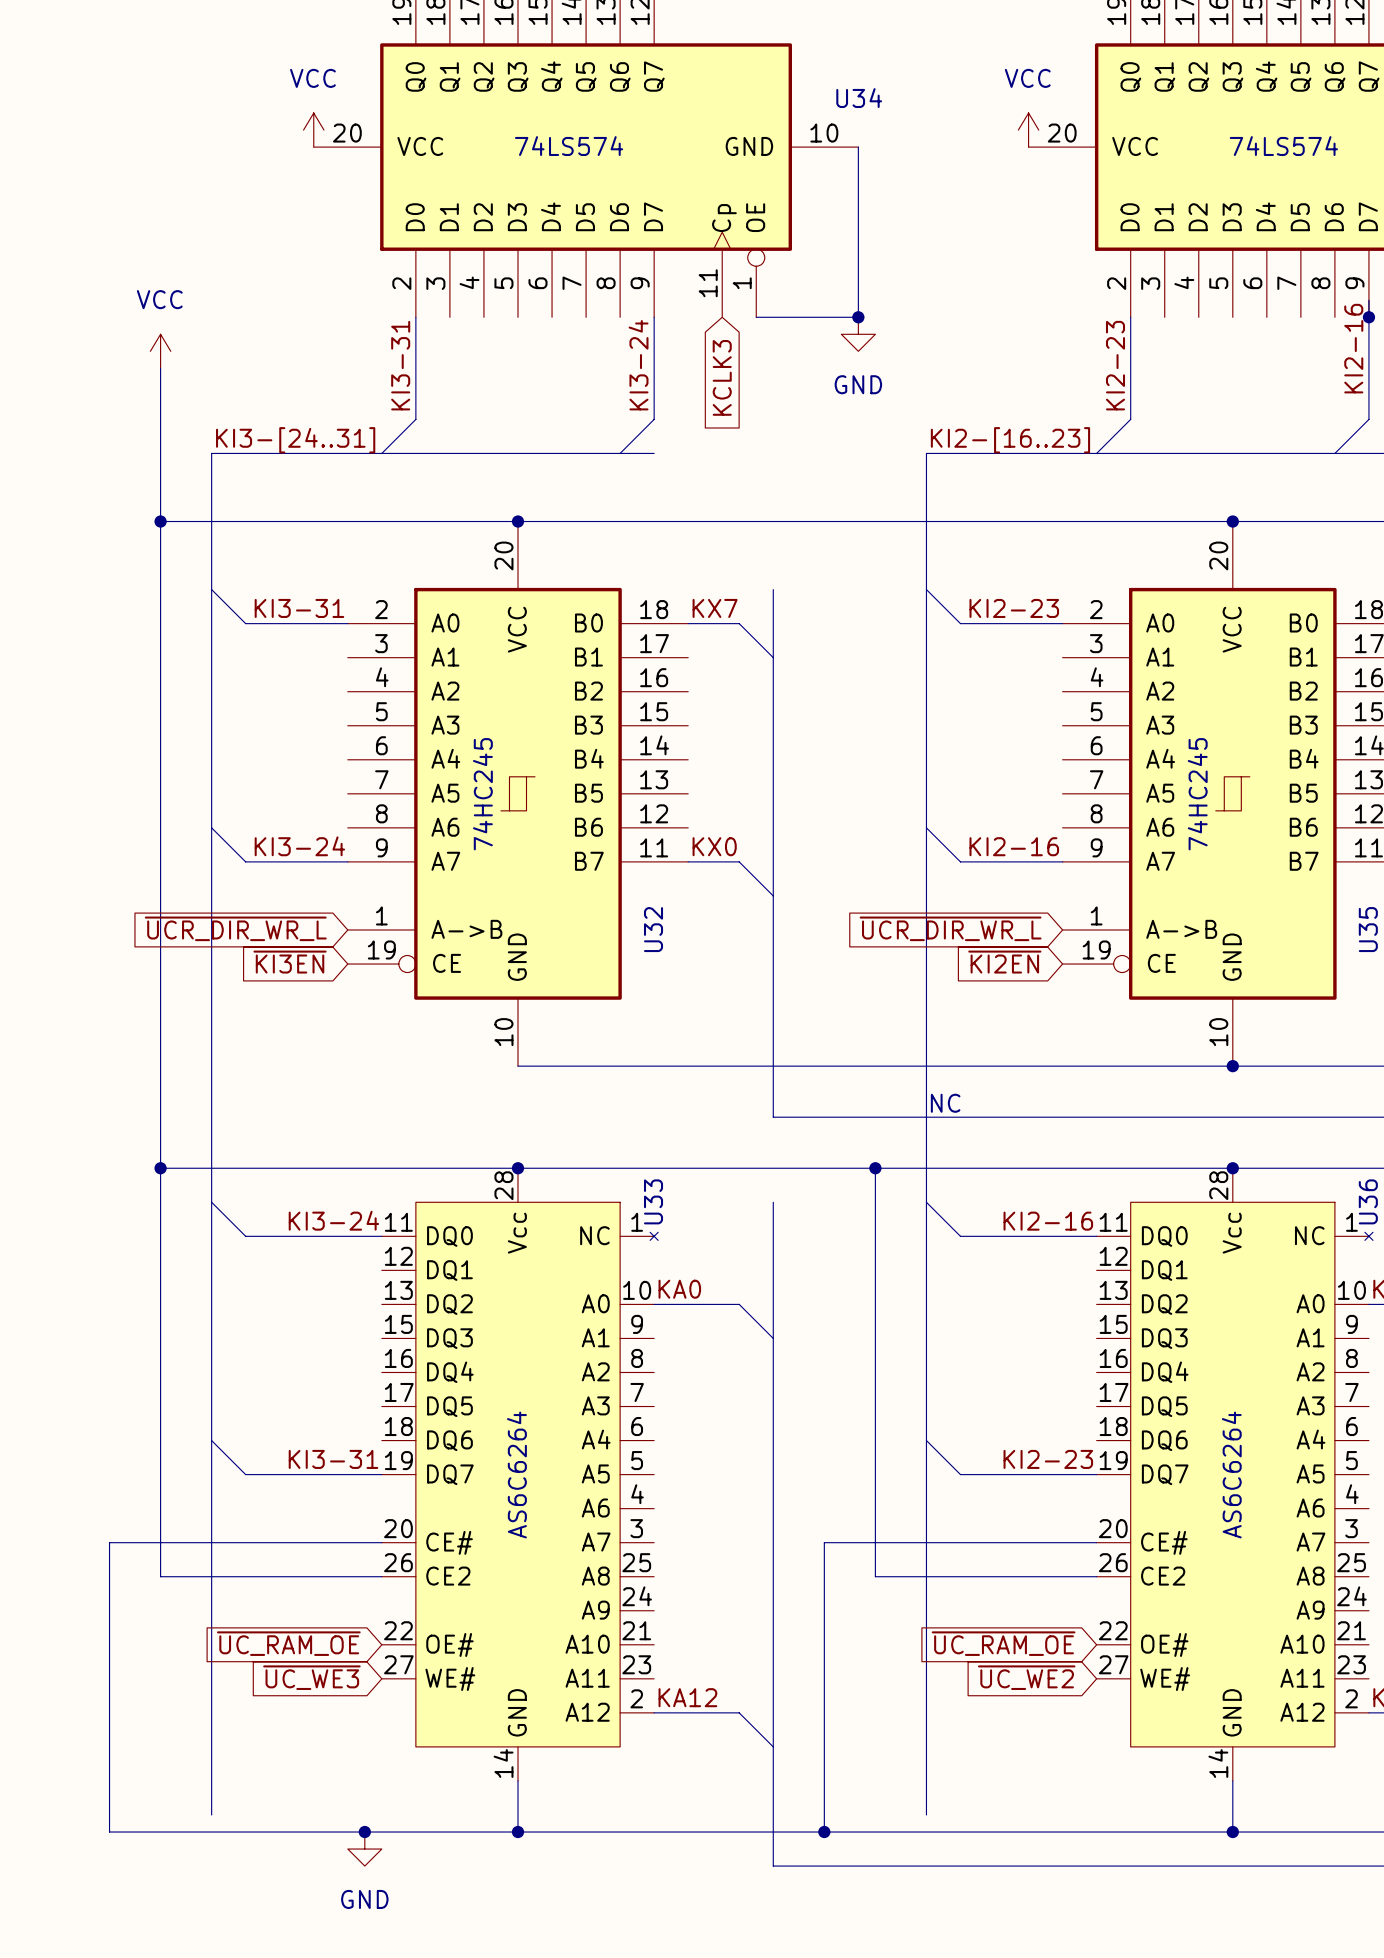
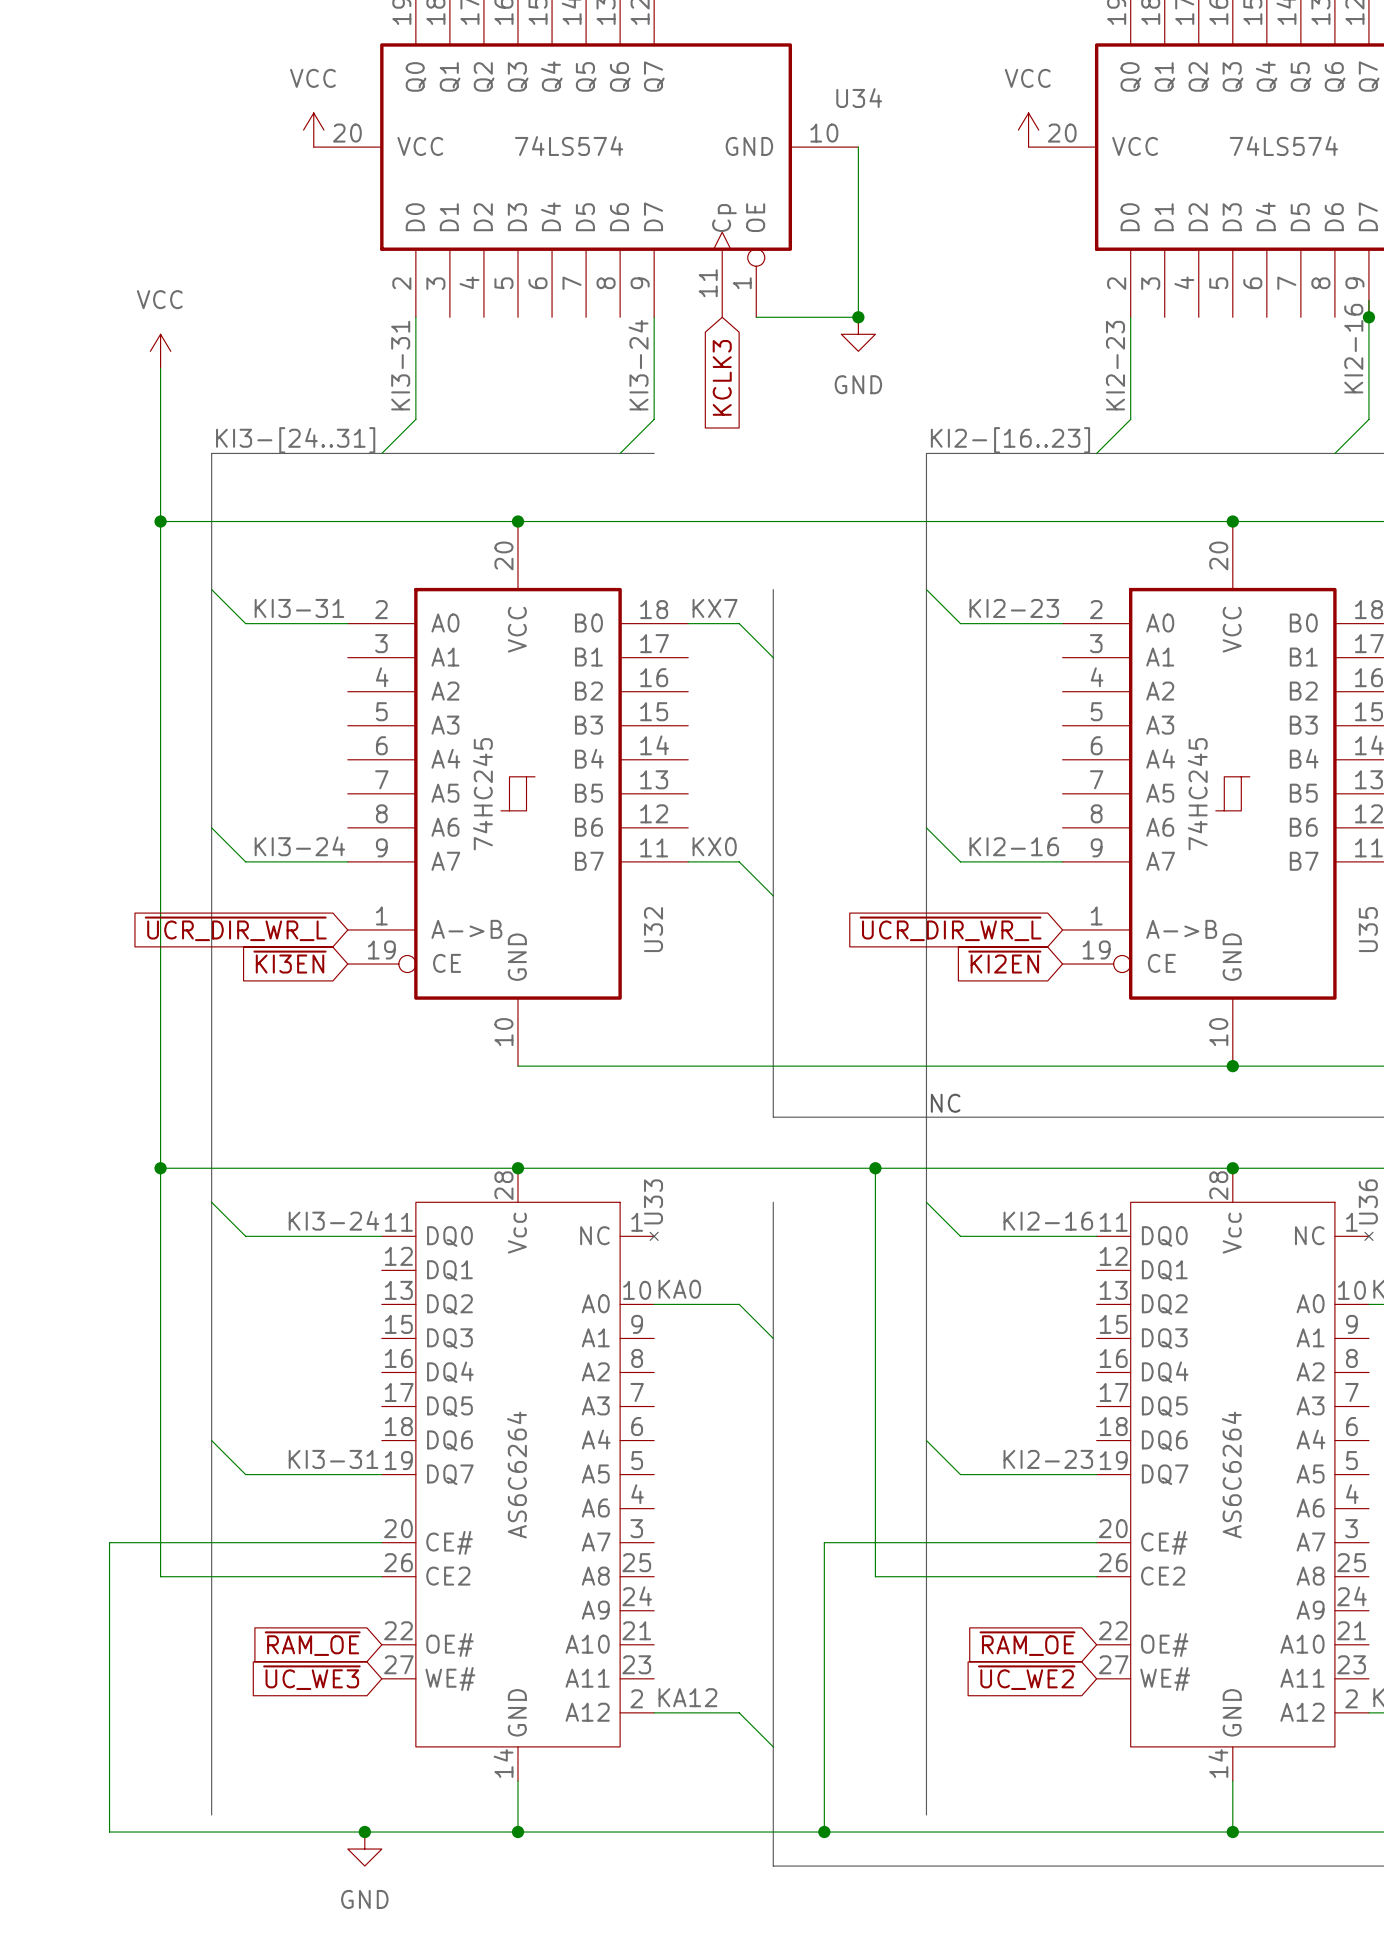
global label: ~{UC_RAM_OE} (288, 1643) -> ~{RAM_OE} (312, 1643)
global label: ~{UC_RAM_OE} (1003, 1643) -> ~{RAM_OE} (1027, 1643)

